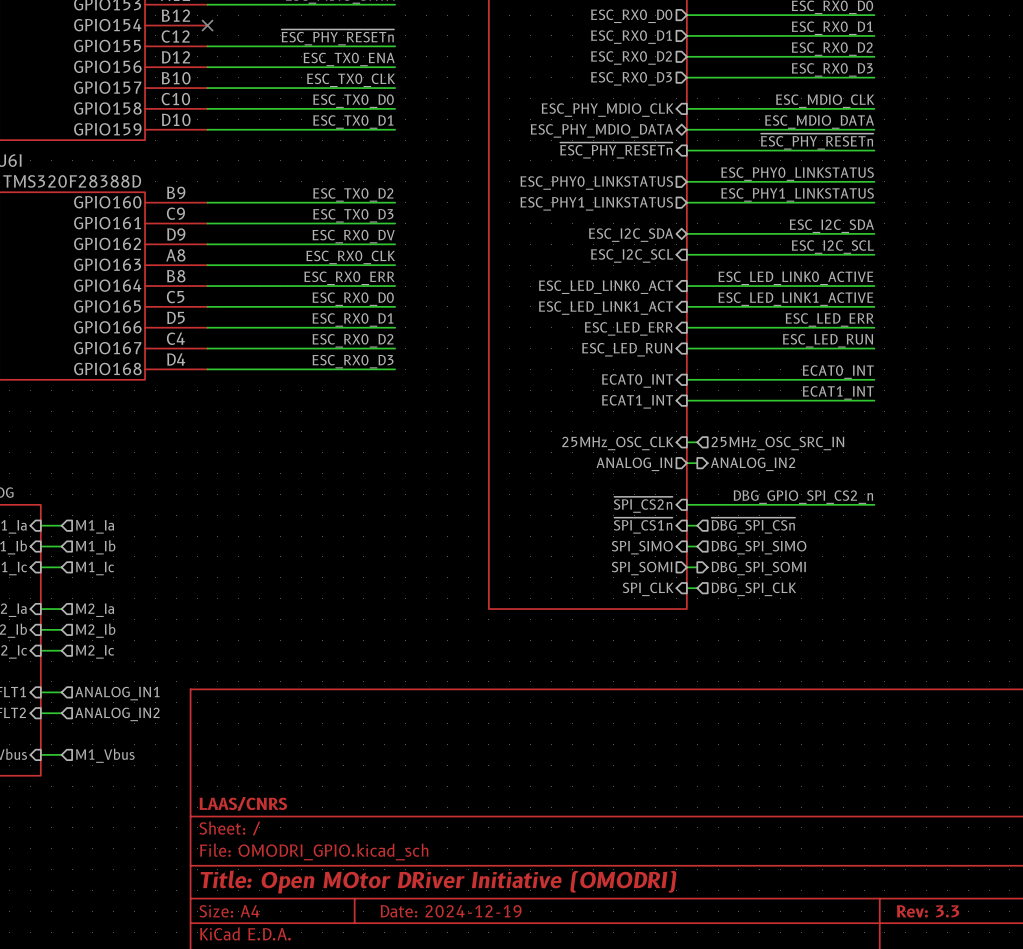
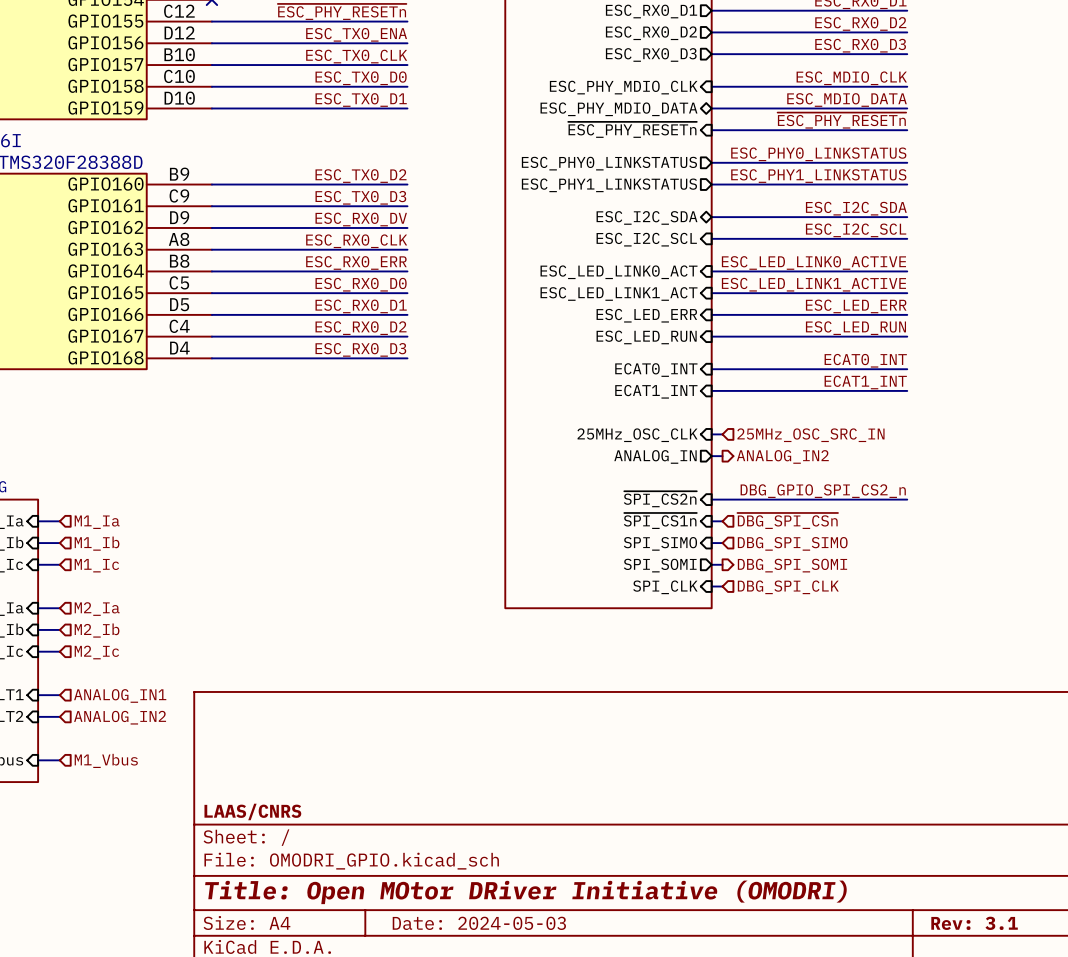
title block: Date: 2024-12-19 (451, 911) -> Date: 2024-05-03 (479, 923)
title block: Rev: 3.3 (928, 911) -> Rev: 3.1 (974, 923)

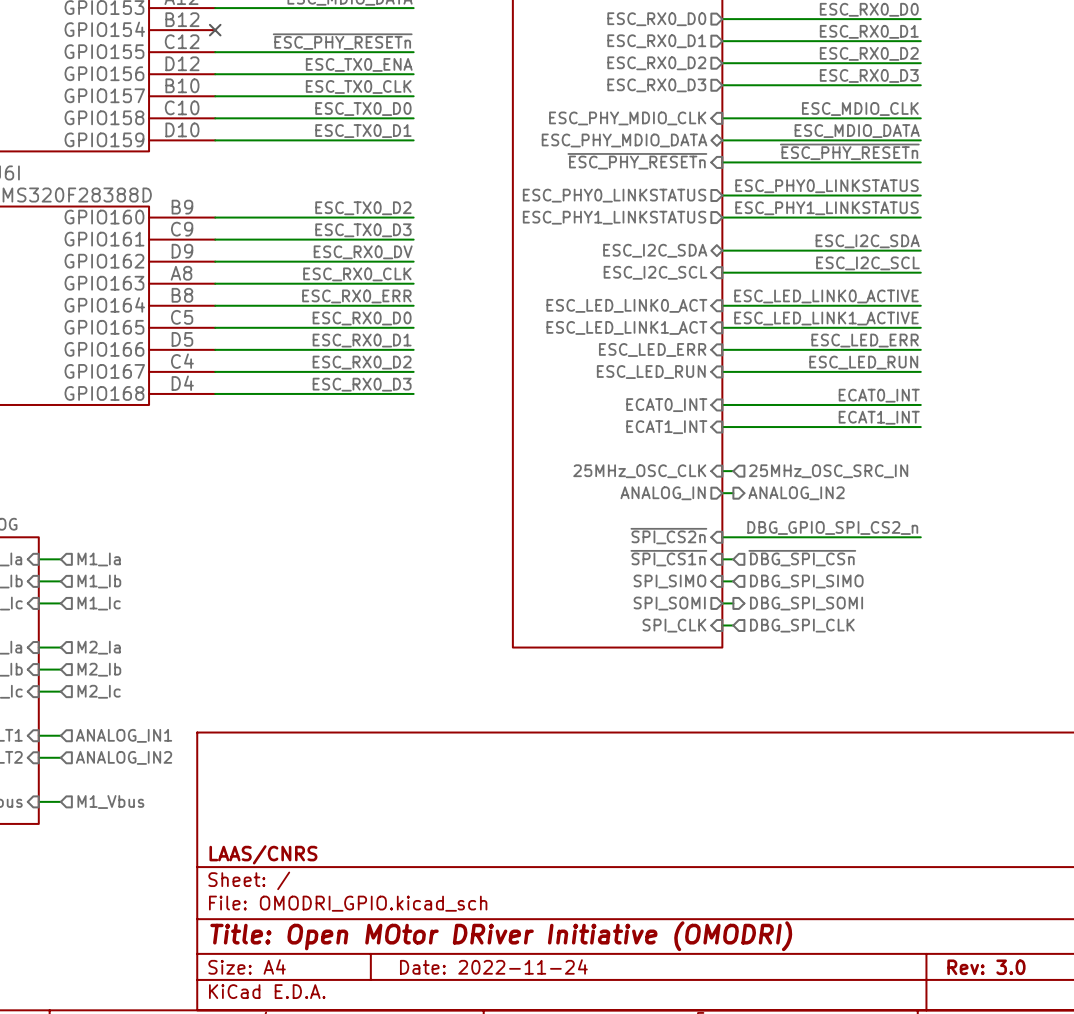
title block: Date: 2024-05-03 (479, 923) -> Date: 2022-11-24 (493, 966)
title block: Rev: 3.1 (974, 923) -> Rev: 3.0 (986, 967)

